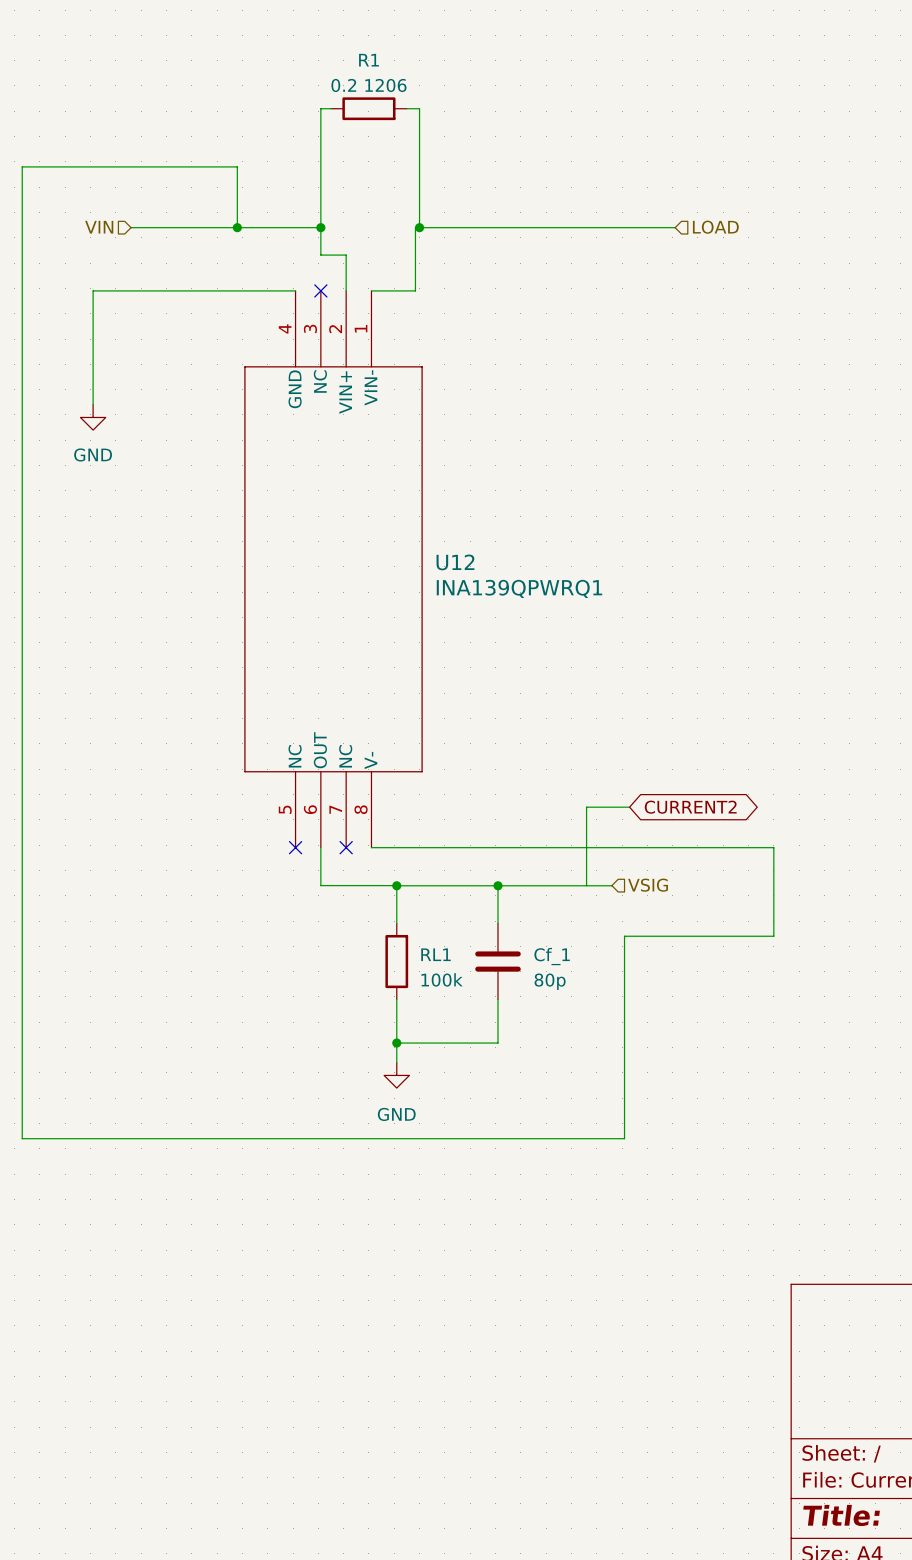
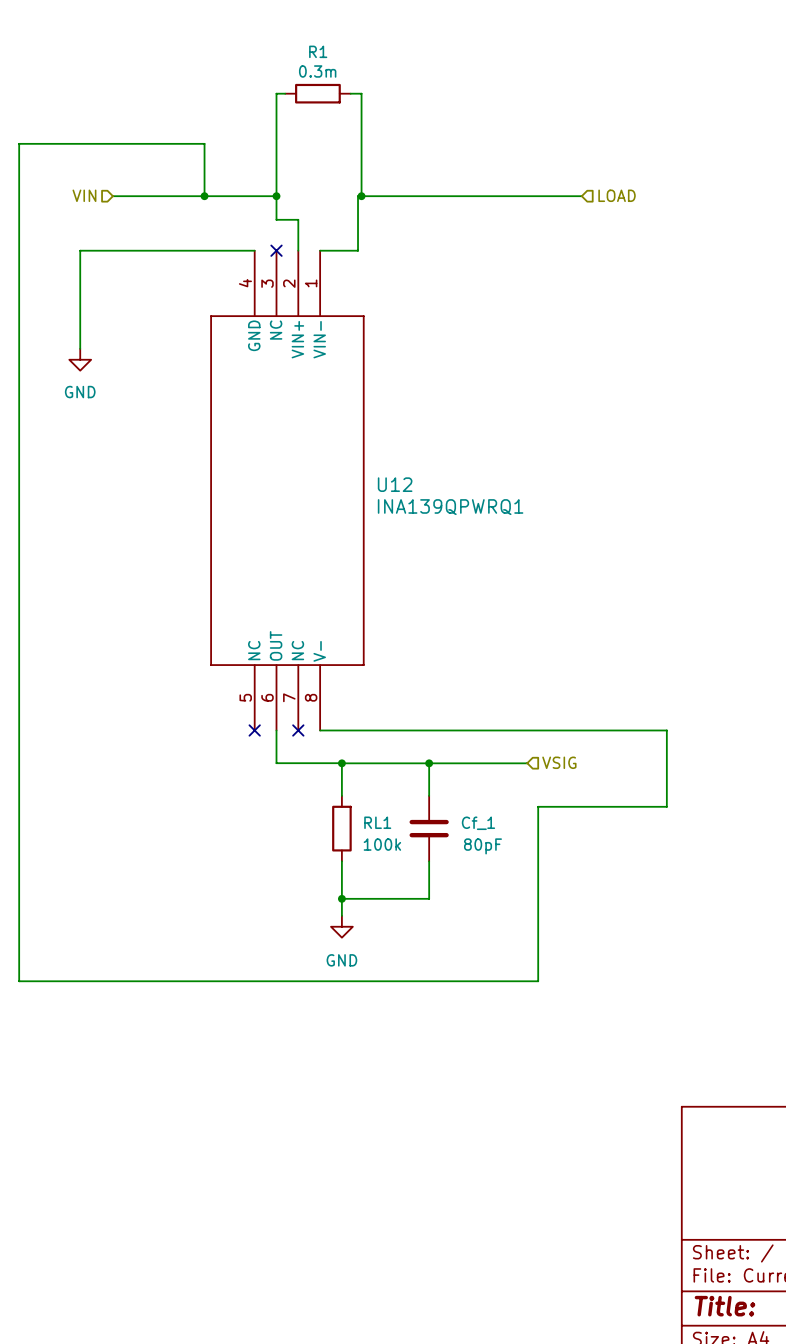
R1 value: 0.2 1206 (368, 85) -> 0.3m (317, 71)
wire: (629, 807) (586, 807) (586, 885) -> none
global label: CURRENT2 (690, 807) -> none
Cf_1 value: 80p (550, 981) -> 80pF (482, 846)

